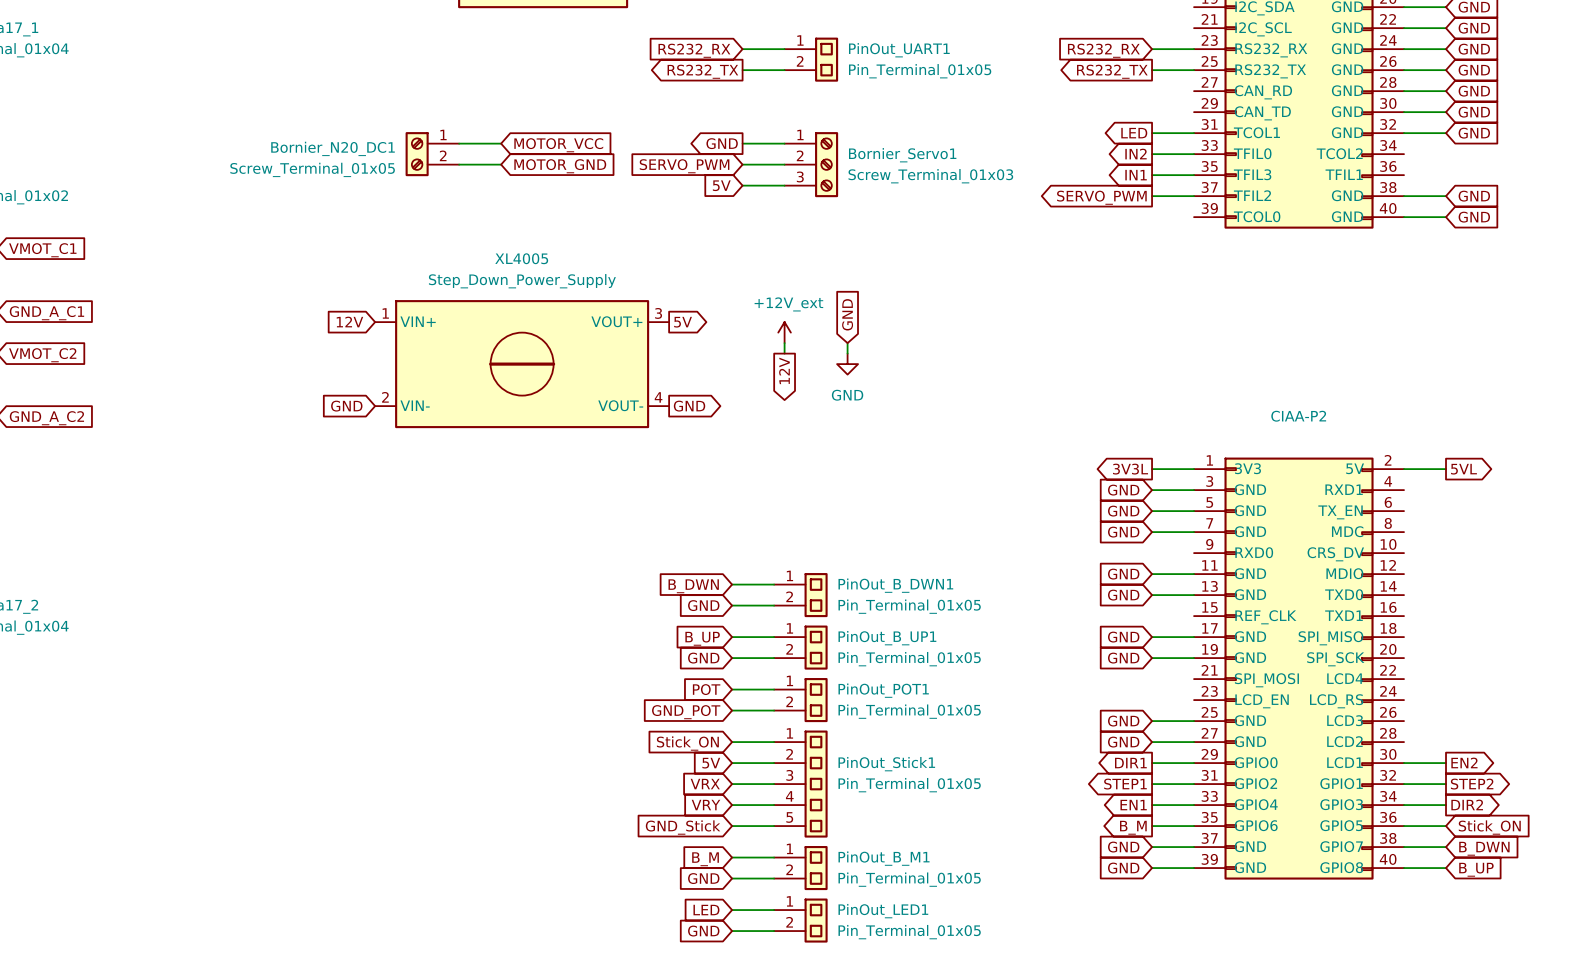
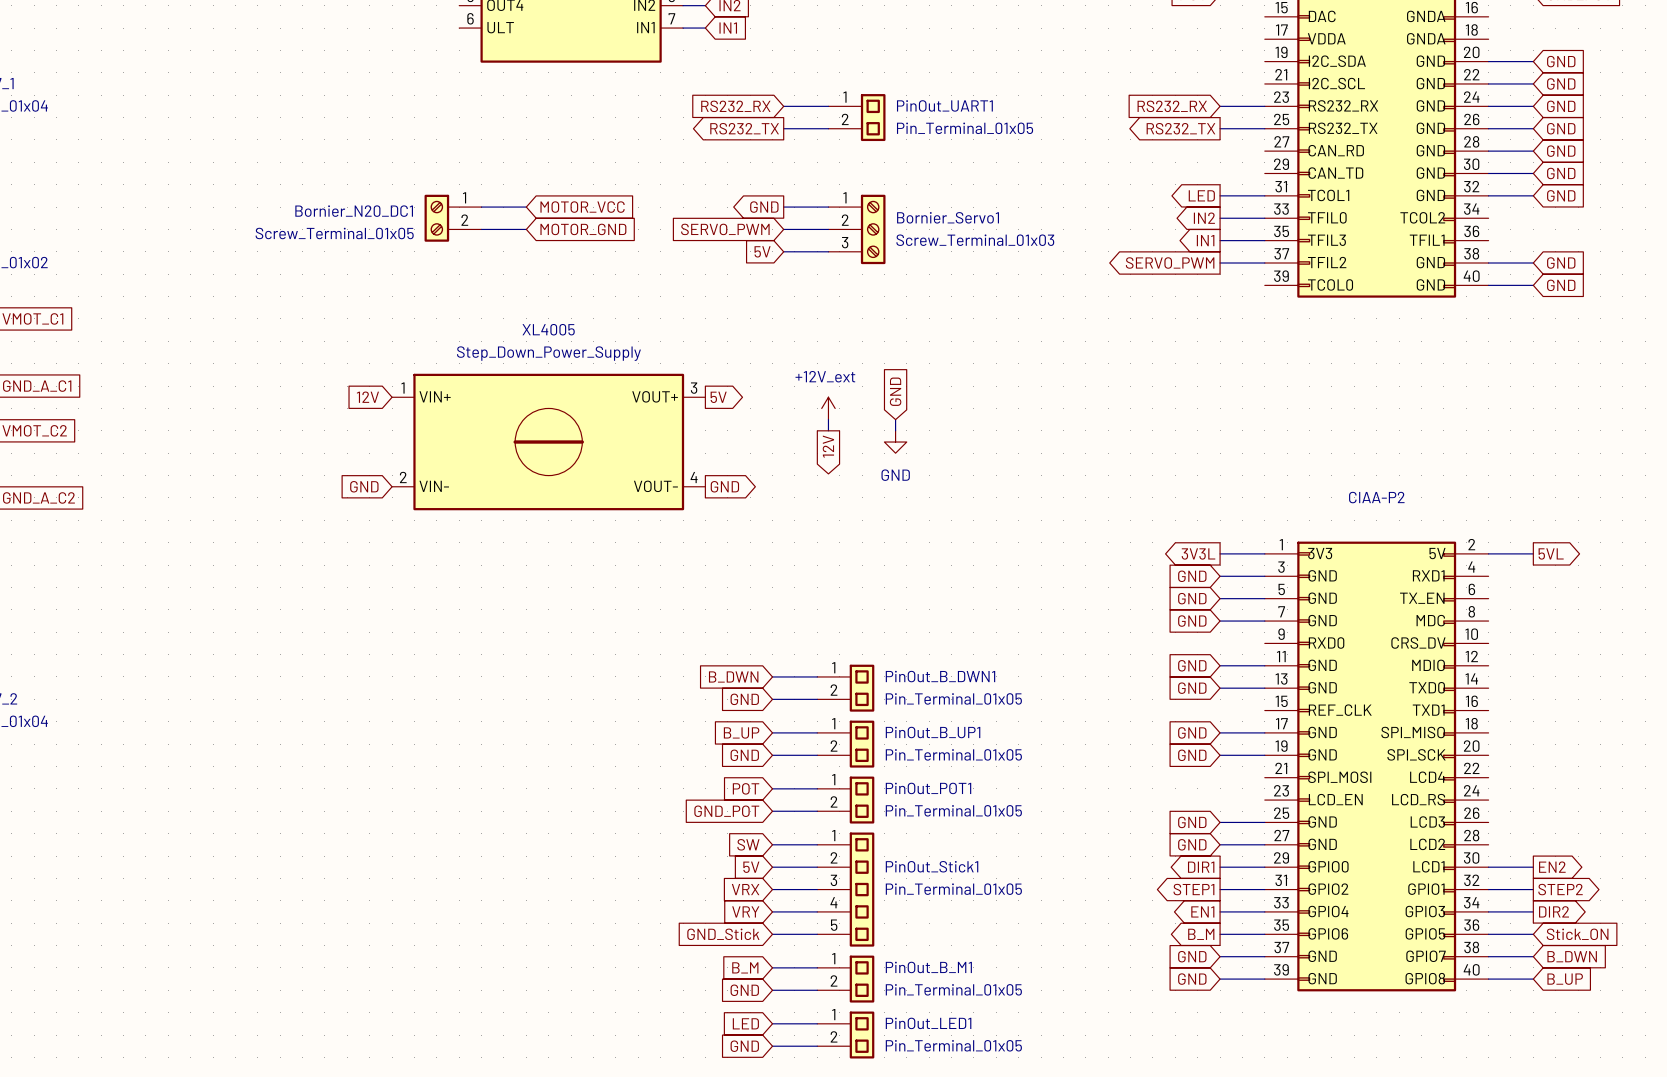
global label: Stick_ON (687, 743) -> SW (748, 844)

